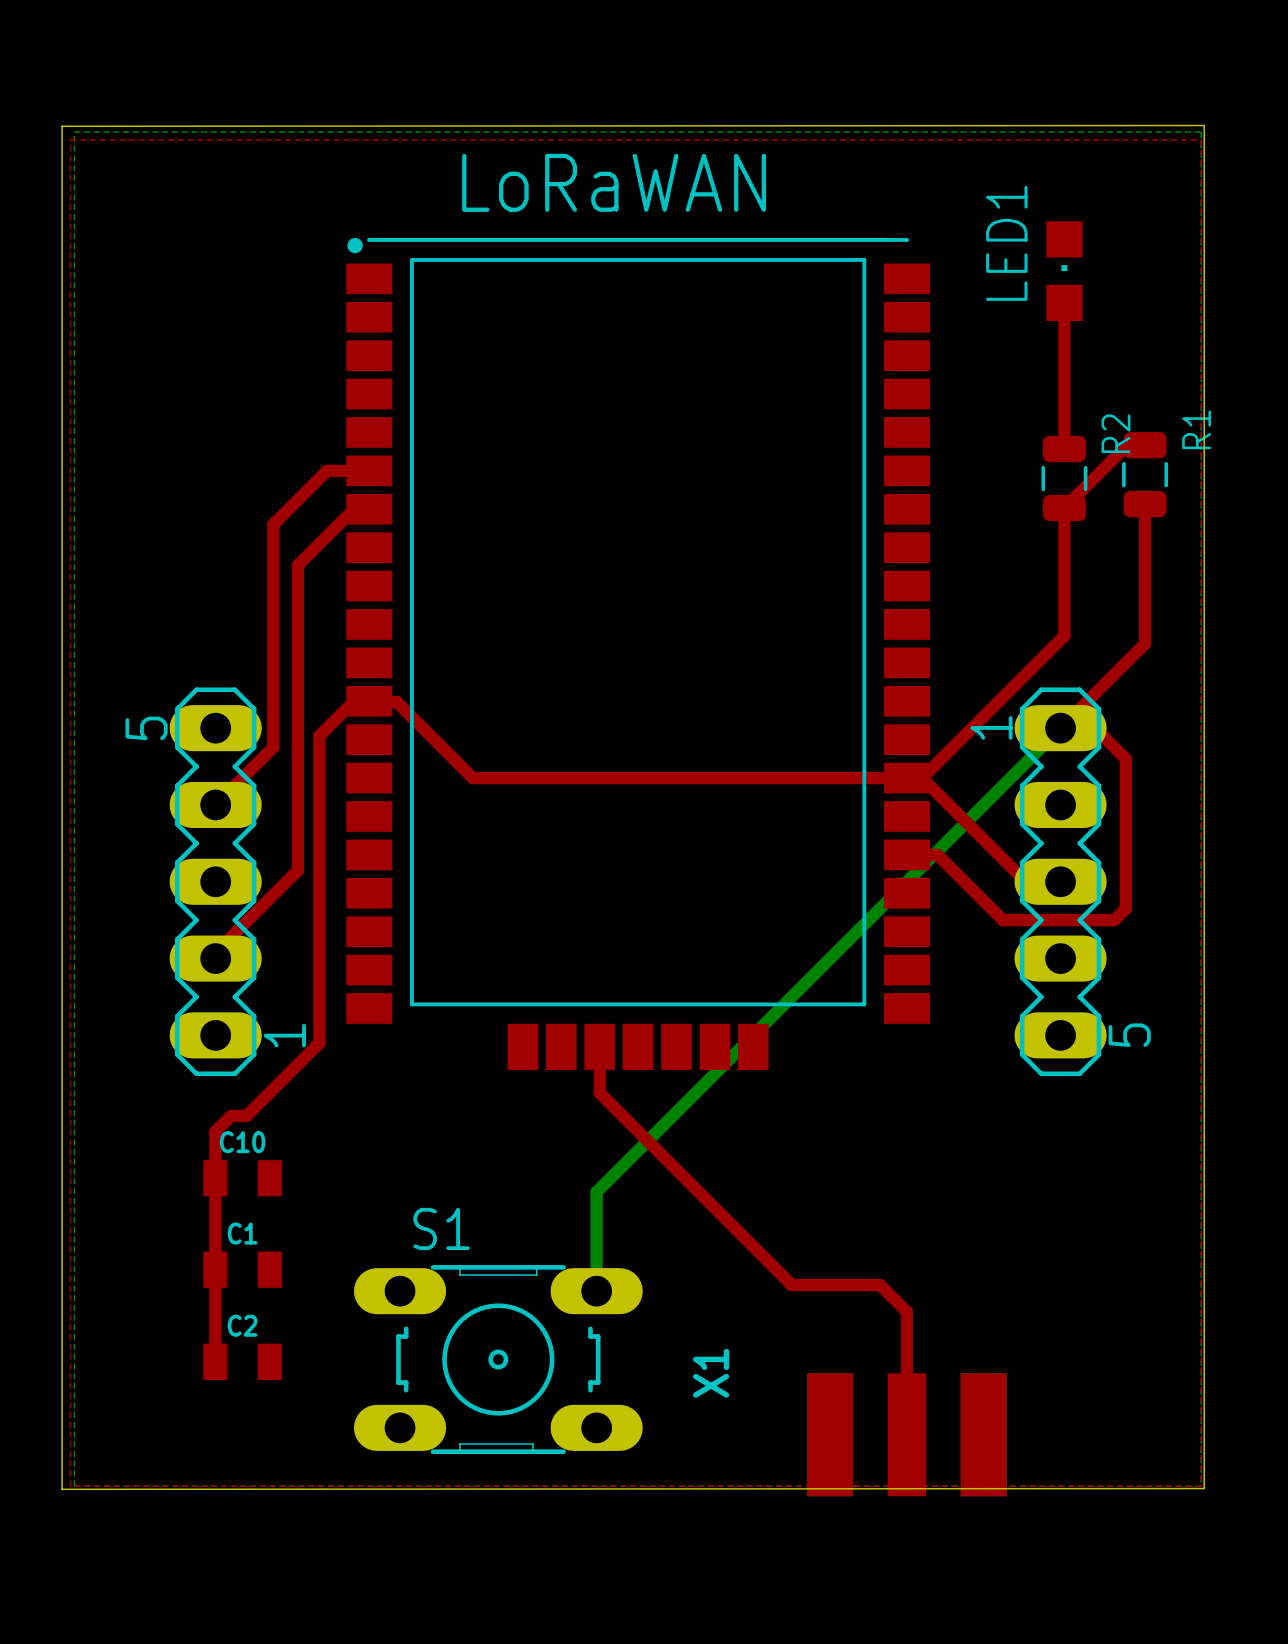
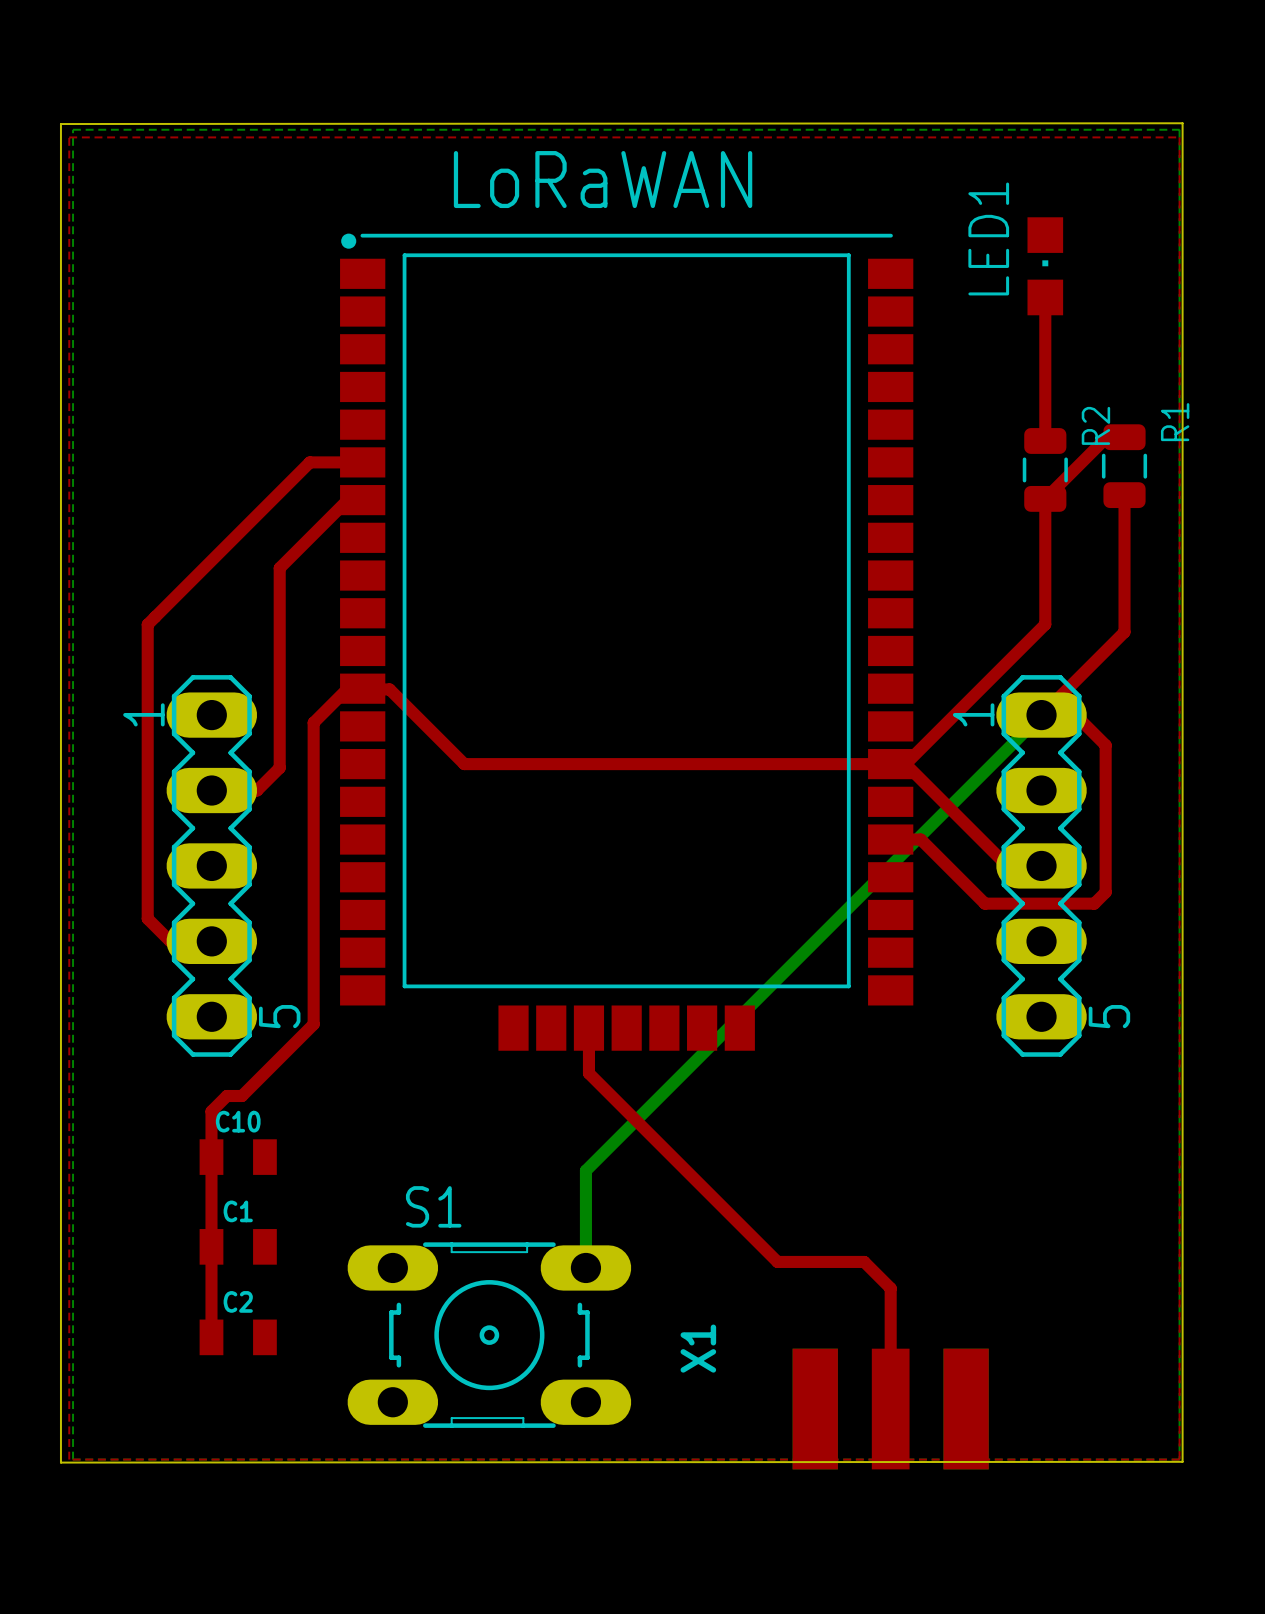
top track: (327, 470) (273, 524) (273, 747) (215, 804) -> (292, 555) (279, 568) (279, 767) (257, 790) (211, 790)
top track: (297, 565) (297, 870) (215, 952) (215, 958) -> (321, 462) (309, 462) (147, 624) (147, 918) (170, 941) (211, 941)
part text position: 5 (146, 728) -> 5 (279, 1016)
part text position: 1 (284, 1035) -> 1 (143, 714)

